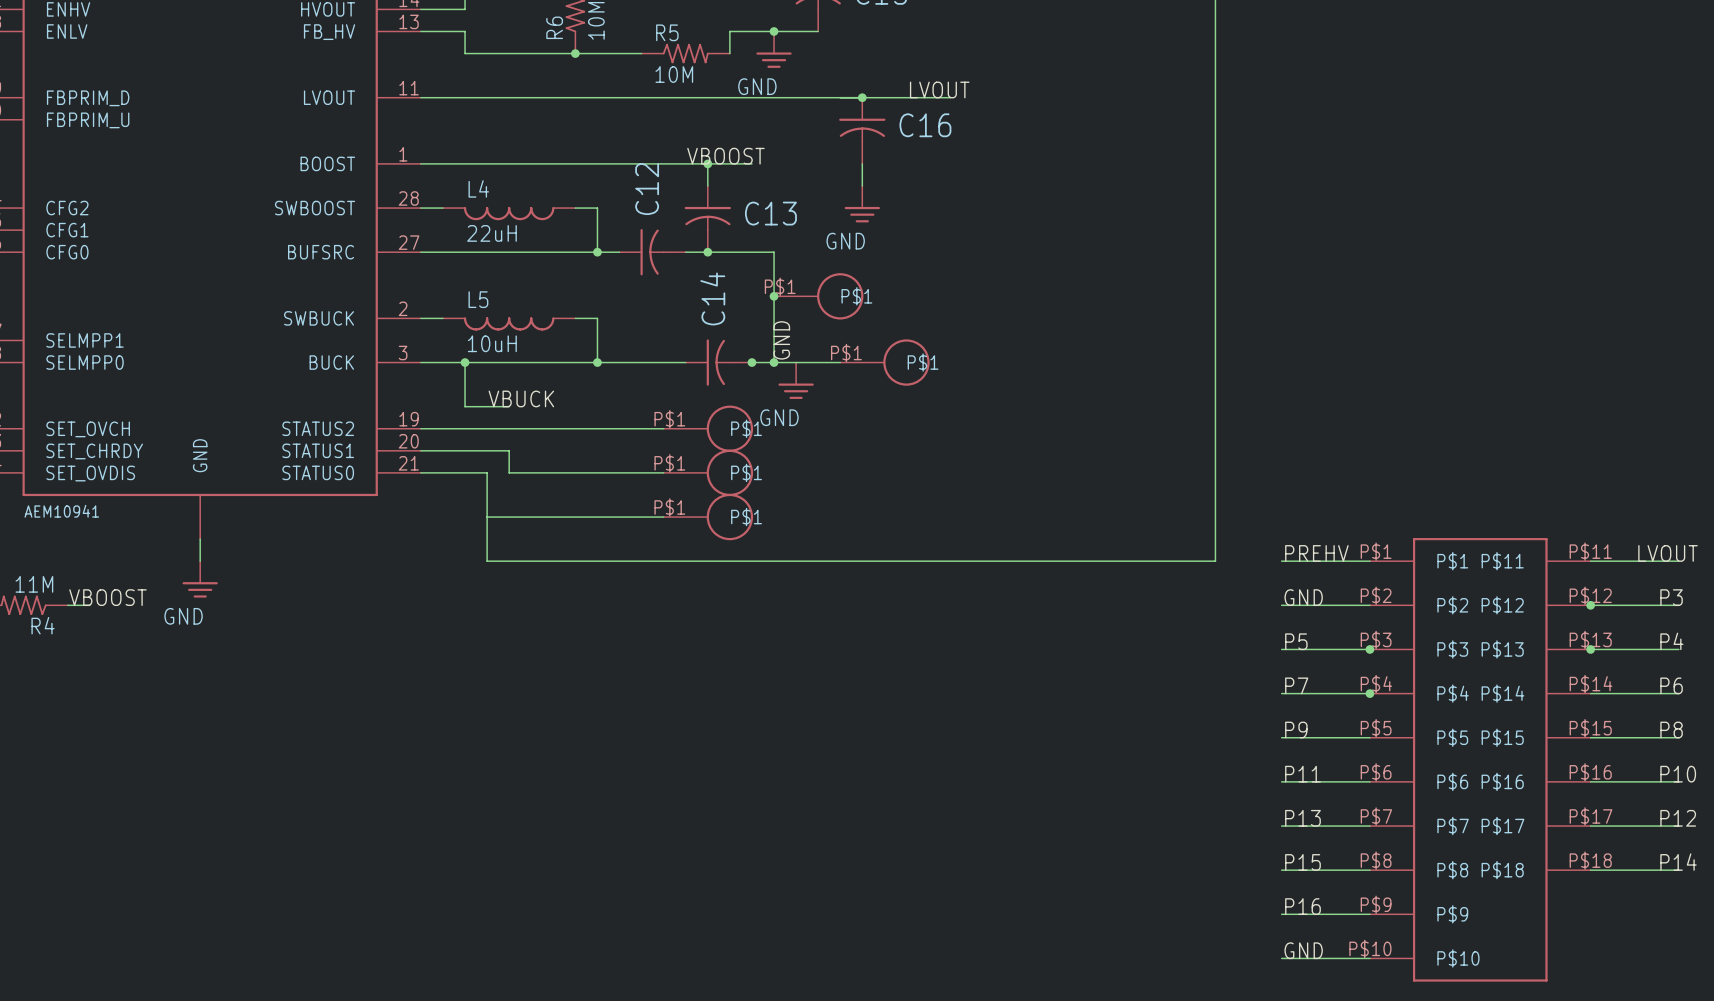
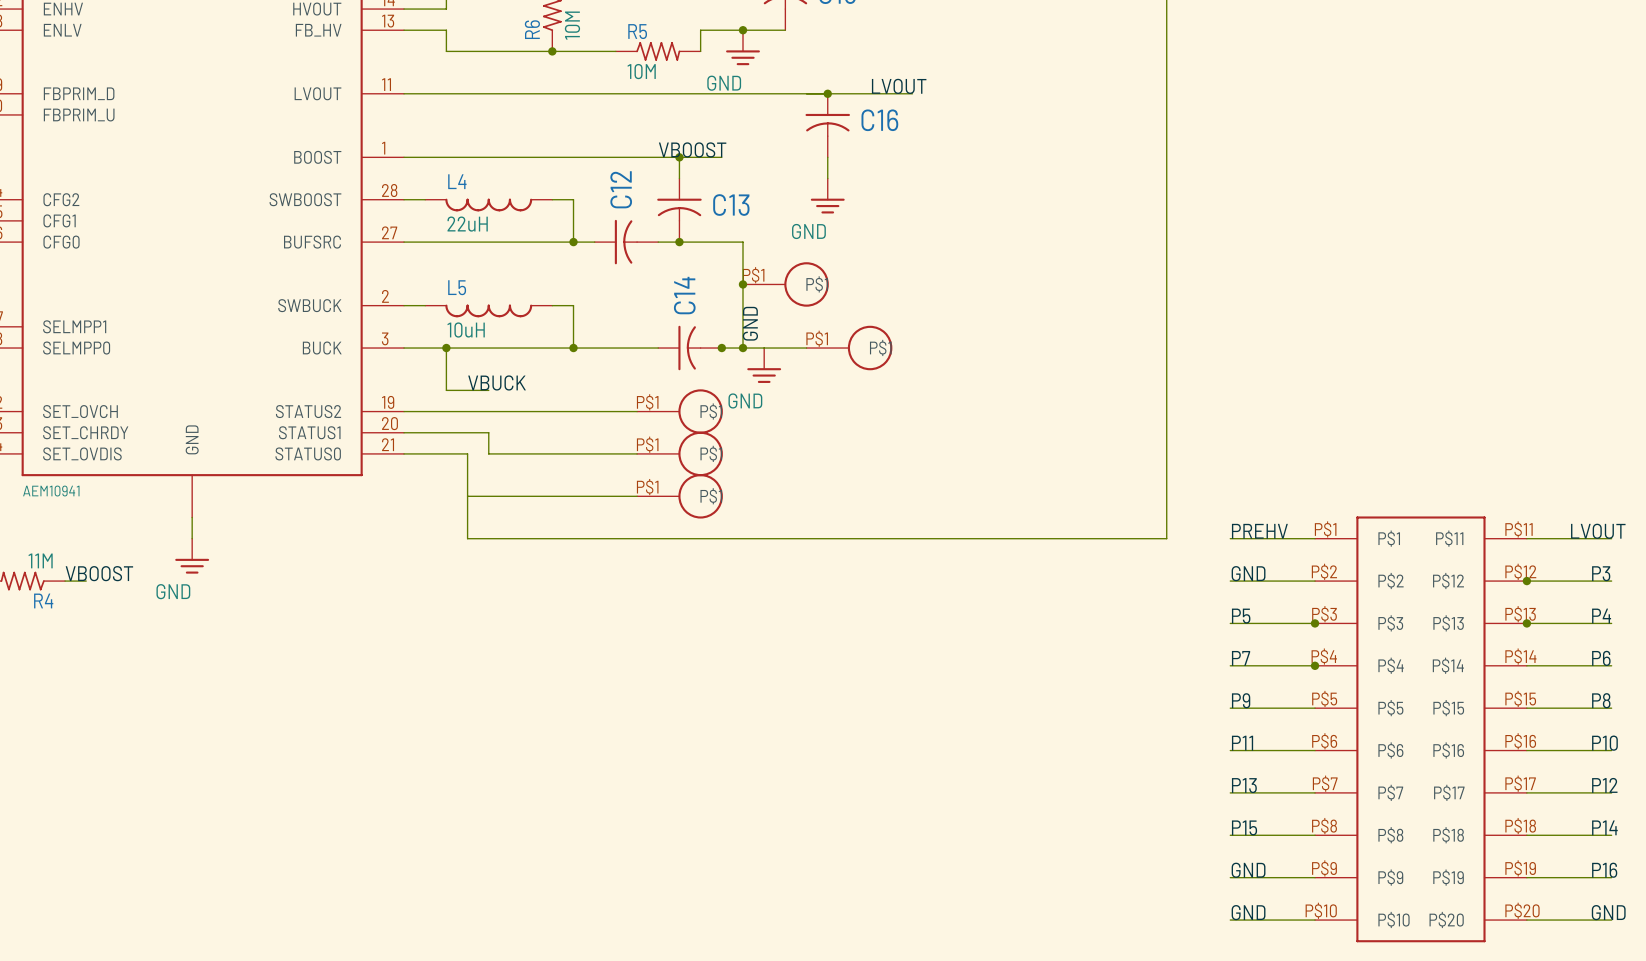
part symbol: [1369, 538, 1591, 982] -> [1315, 516, 1527, 943]
label: P16 (1302, 906) -> GND (1248, 870)
label: none -> P16 (1604, 870)
wire: none -> (1526, 877) (1611, 877)
label: none -> GND (1608, 912)
wire: none -> (1526, 920) (1611, 920)

